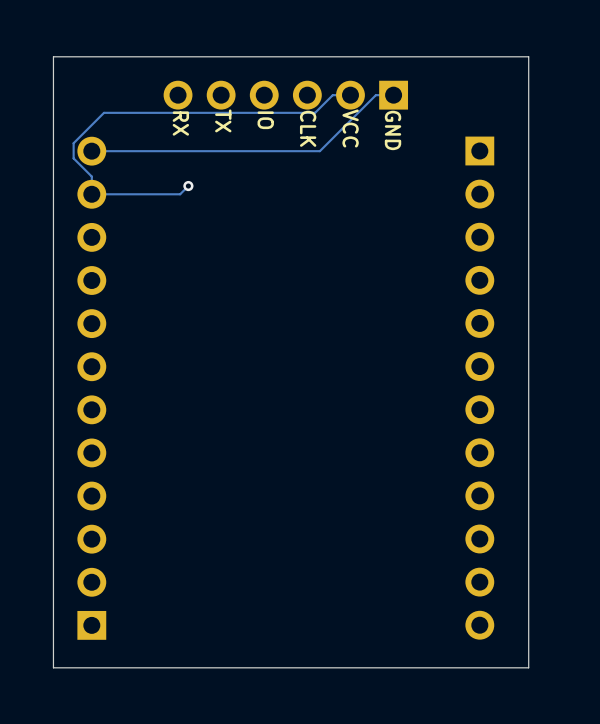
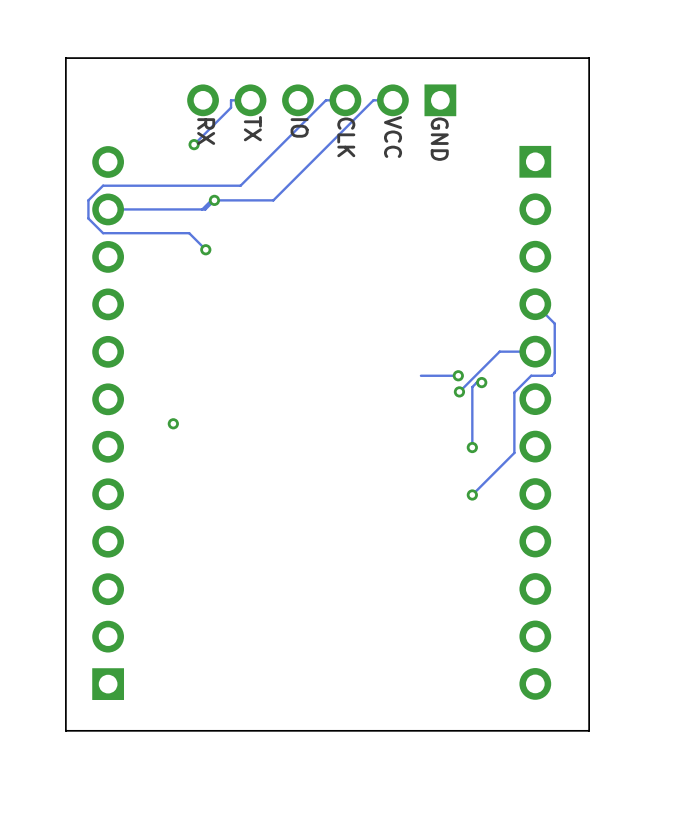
track: none -> (250, 100) (231, 100) (231, 107) (194, 144)
track: none -> (345, 100) (325, 100) (240, 185) (103, 185) (88, 200) (88, 218) (103, 233) (189, 233) (205, 249)
track: (393, 95) (375, 95) (319, 151) (91, 151) -> none
track: (315, 112) (104, 112) (73, 143) (73, 158) (91, 176) (91, 194) -> (353, 119) (273, 200) (211, 200) (202, 209)
via: none -> (194, 144)
via: none -> (205, 249)
track: none -> (535, 304) (554, 323) (554, 372) (551, 375) (531, 375) (514, 392) (514, 452) (472, 494)
track: none -> (535, 351) (499, 351) (459, 391)
track: none -> (458, 375) (420, 375)
via: none -> (458, 375)
track: none -> (481, 382) (476, 382) (472, 387) (472, 447)
via: none -> (481, 382)
via: none -> (459, 391)
via: none -> (173, 423)
via: none -> (472, 447)
via: none -> (472, 494)

